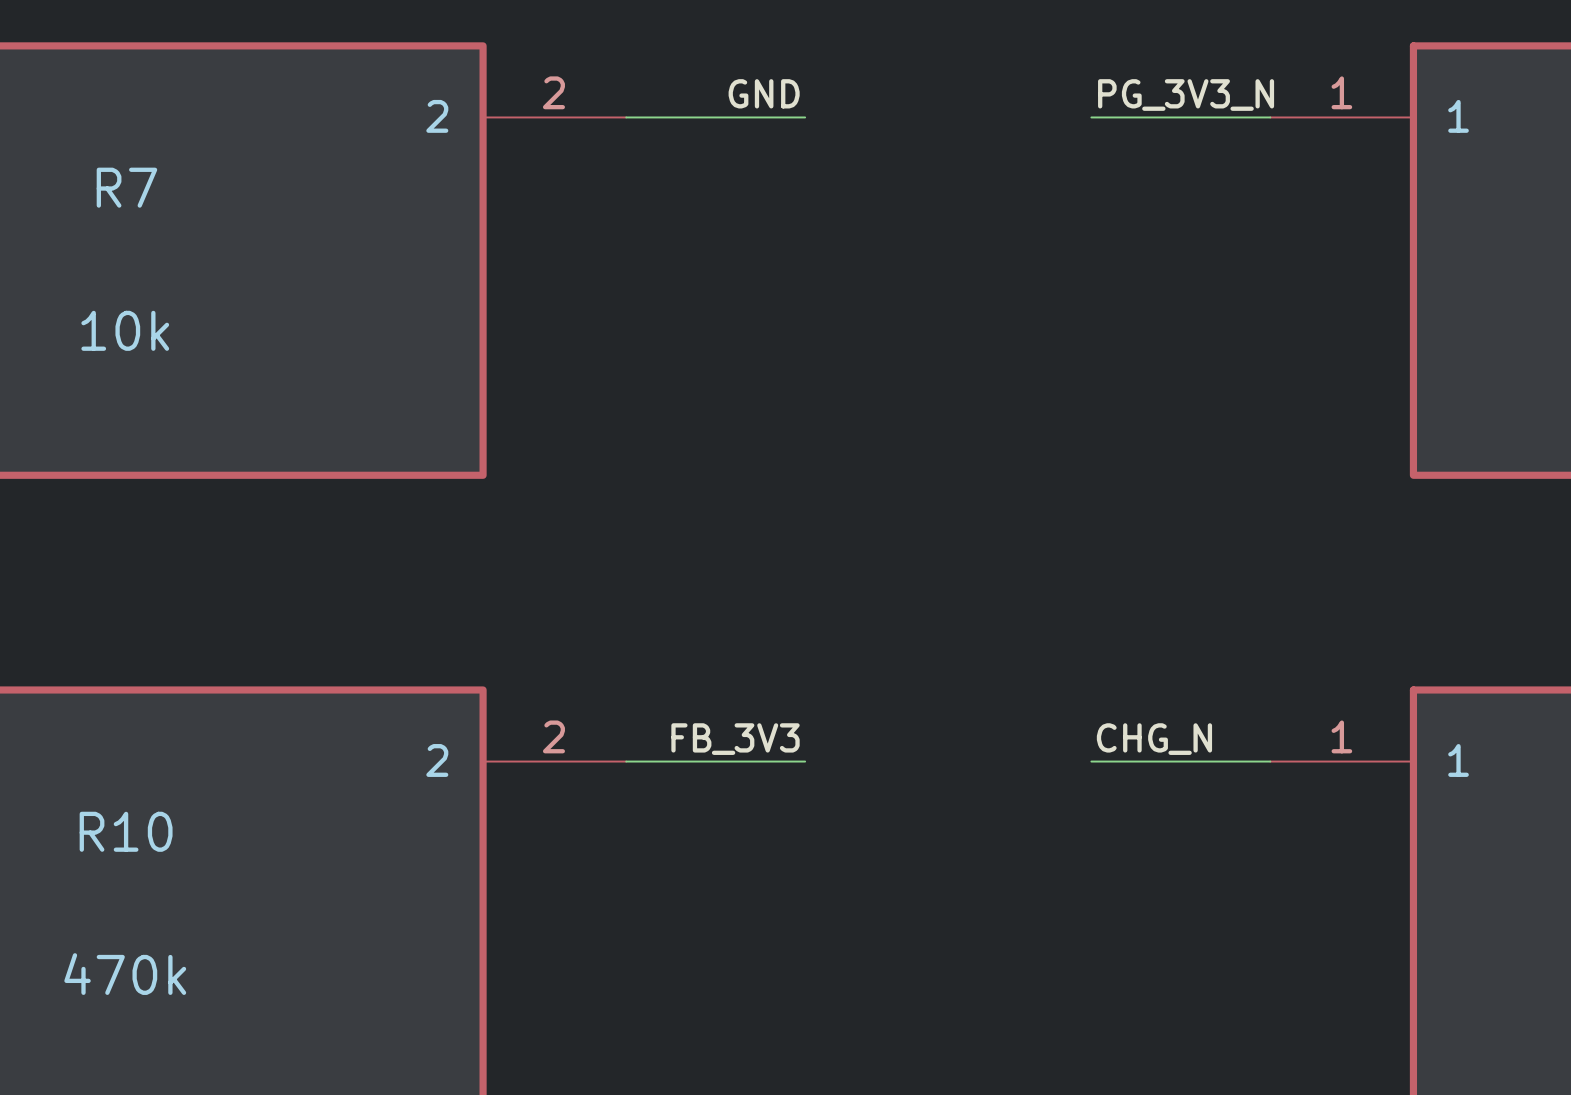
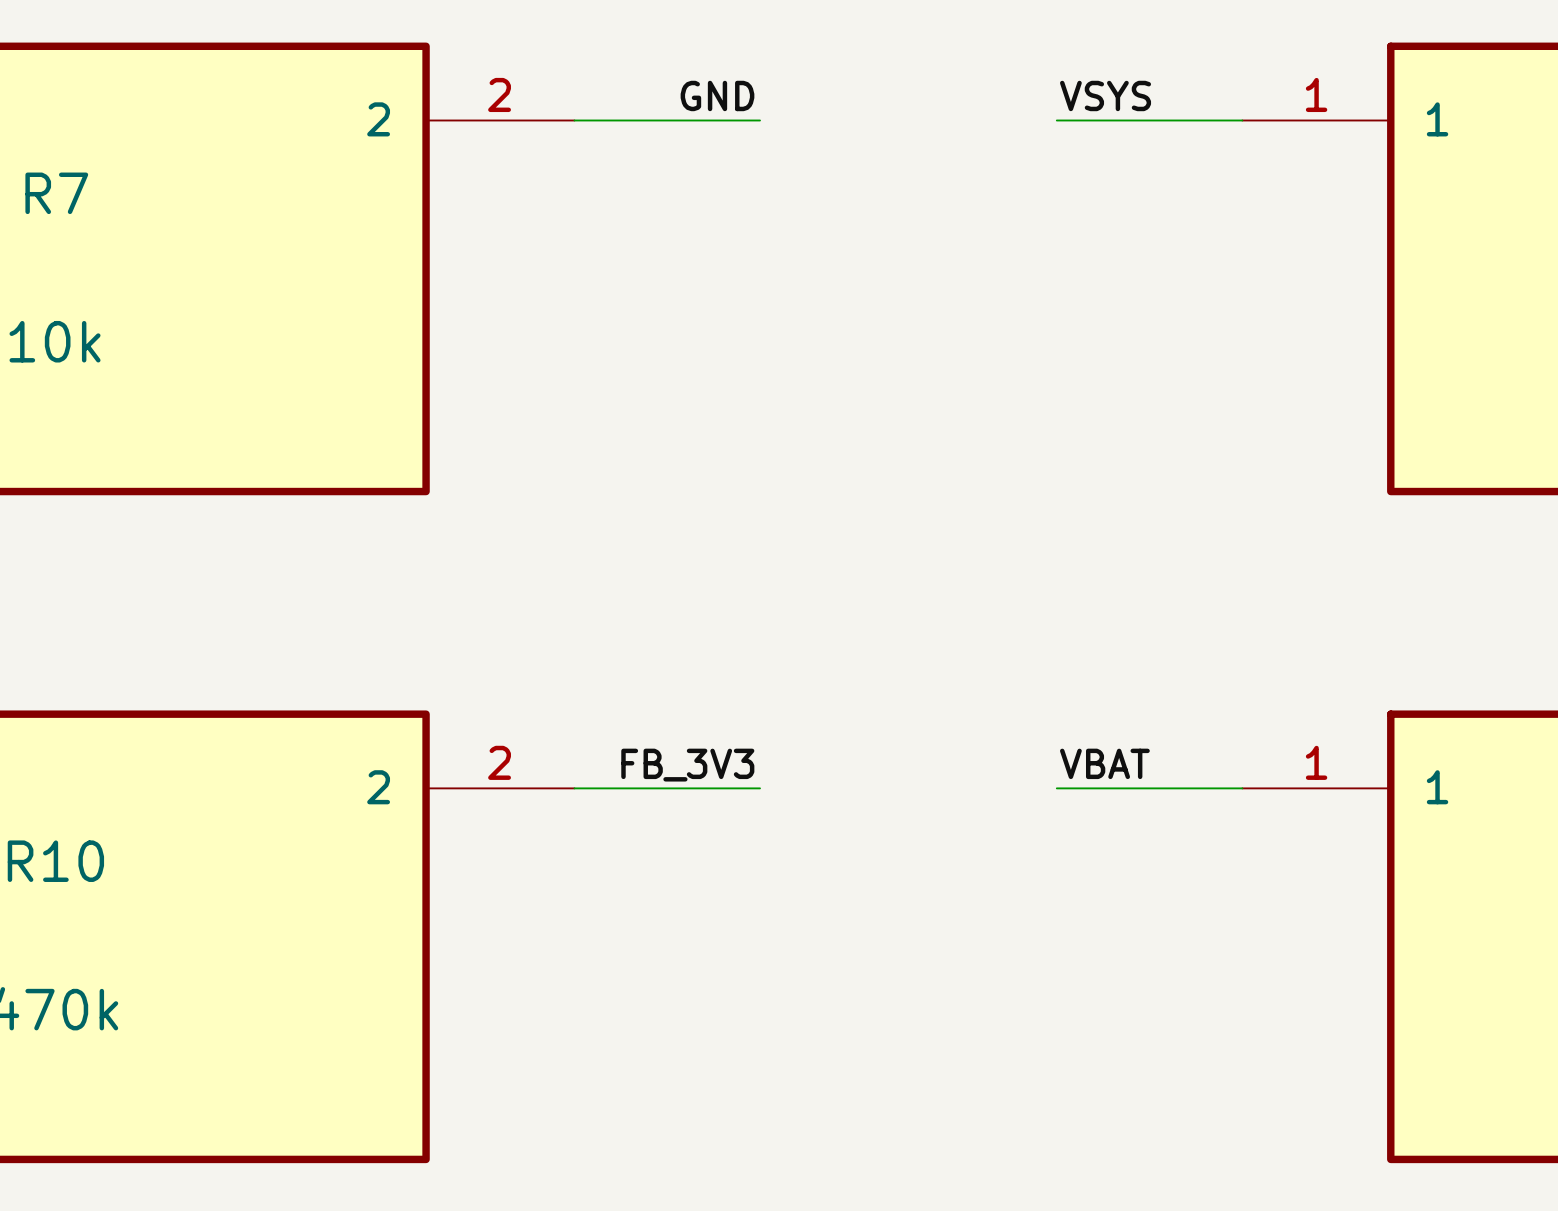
label: PG_3V3_N (1186, 95) -> VSYS (1105, 95)
label: CHG_N (1154, 739) -> VBAT (1104, 763)

